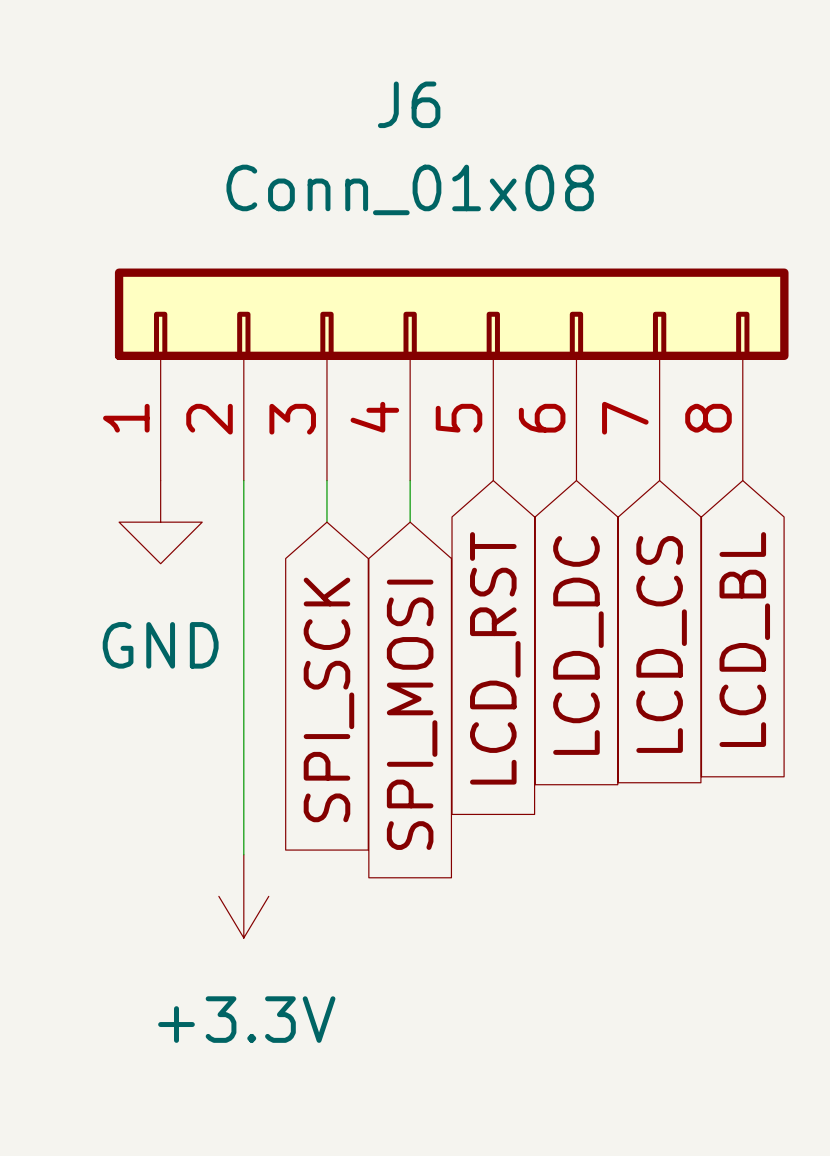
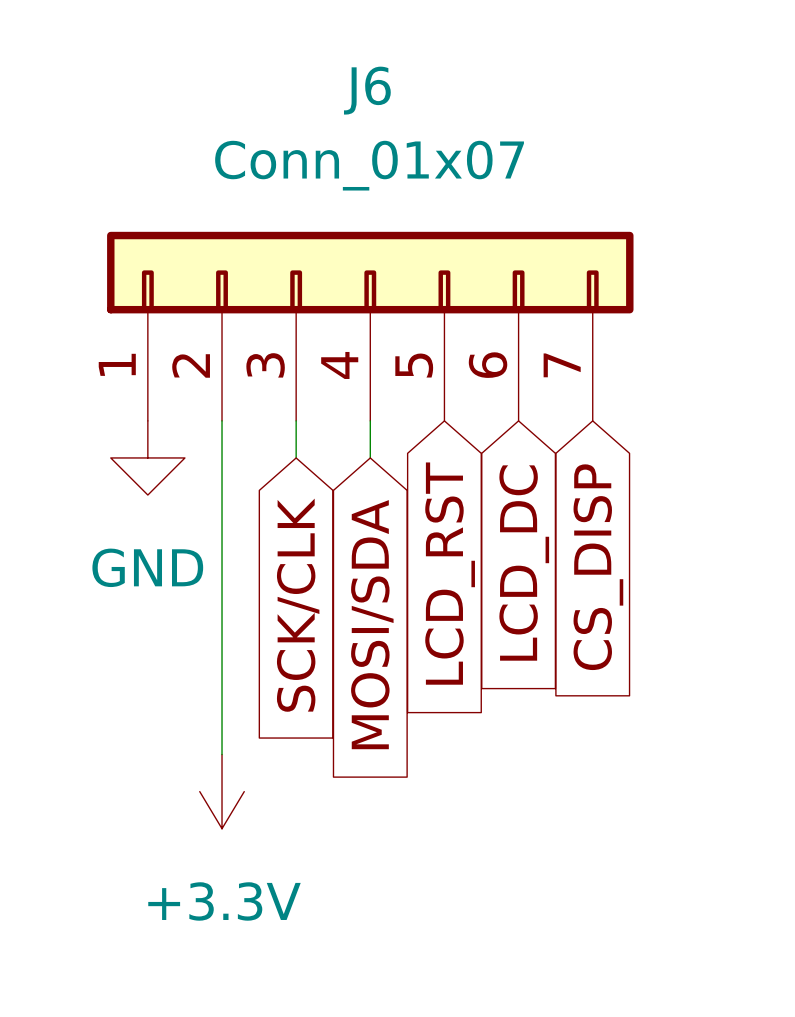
J6 value: Conn_01x08 (410, 189) -> Conn_01x07 (369, 165)
J6 symbol: [114, 268, 789, 481] -> [107, 231, 634, 421]
global label: LCD_BL (744, 639) -> none
global label: LCD_CS (661, 644) -> CS_DISP (598, 567)
global label: SPI_SCK (328, 699) -> SCK/CLK (298, 605)
global label: SPI_MOSI (412, 714) -> MOSI/SDA (372, 624)

